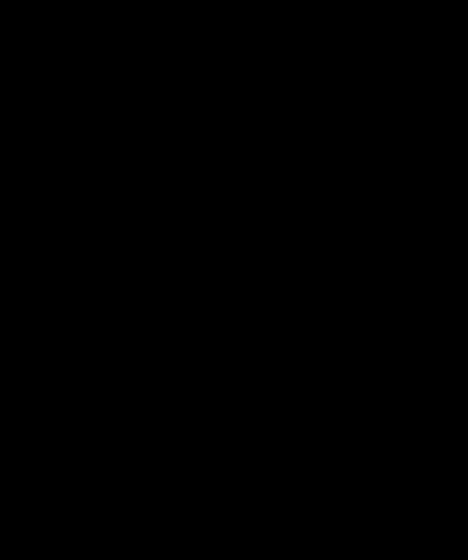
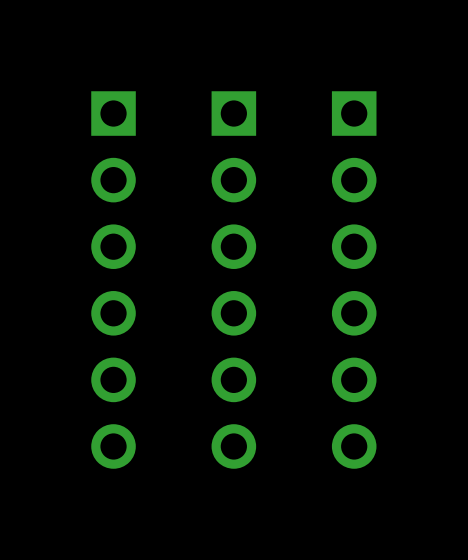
part: none -> (113, 280)
part: none -> (233, 280)
part: none -> (354, 280)

